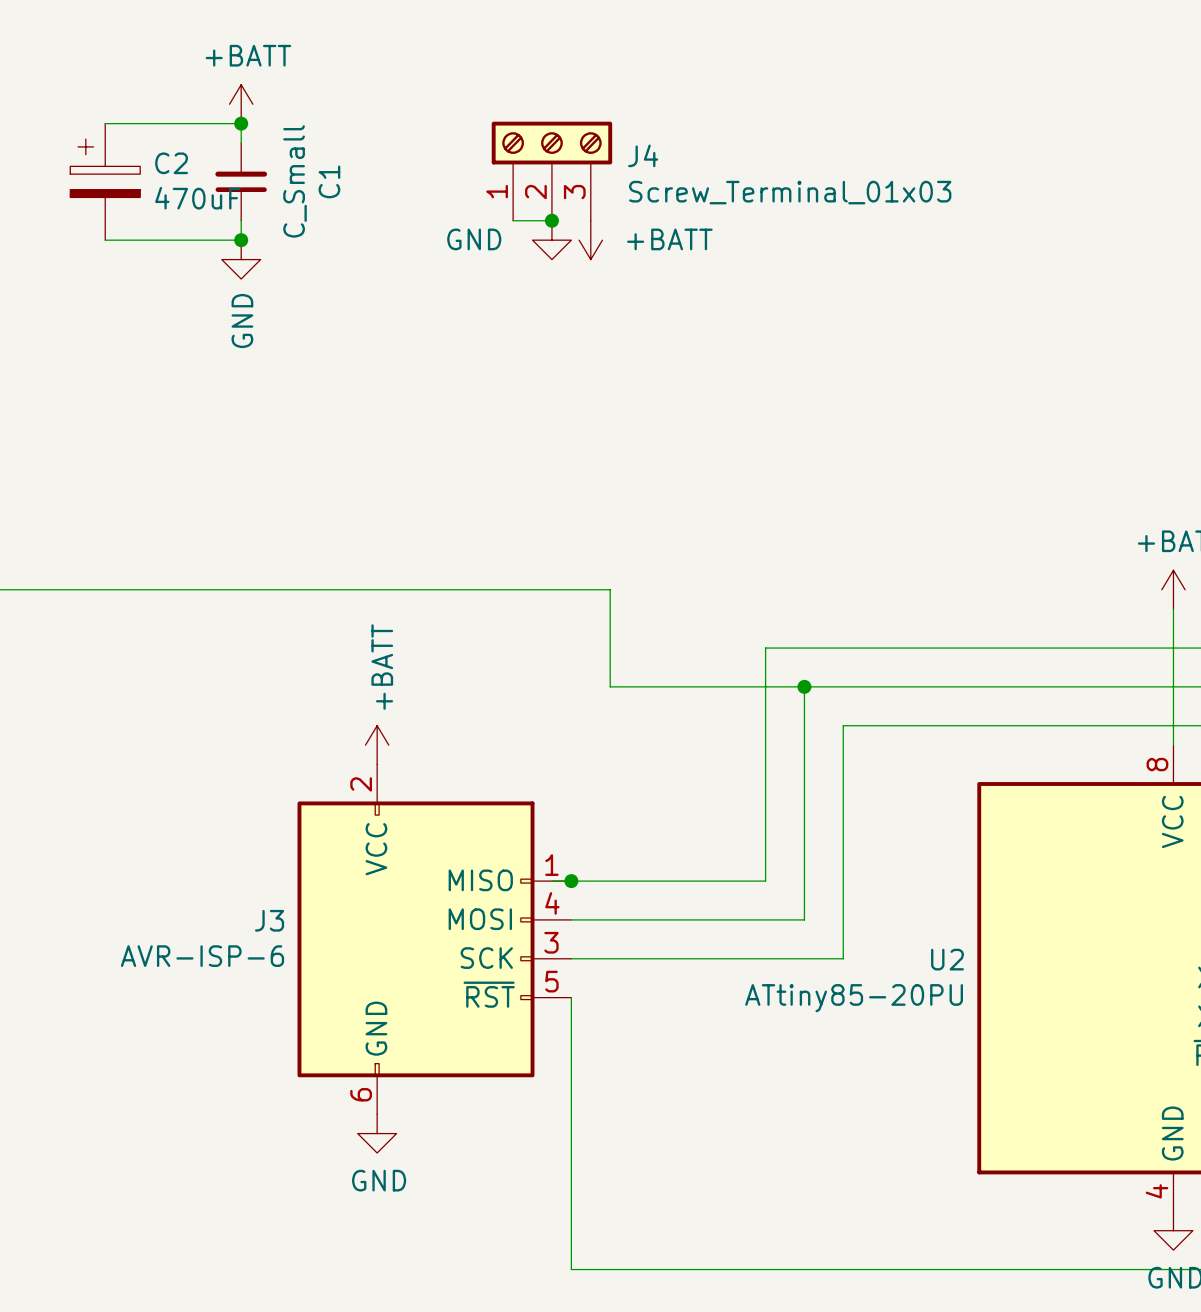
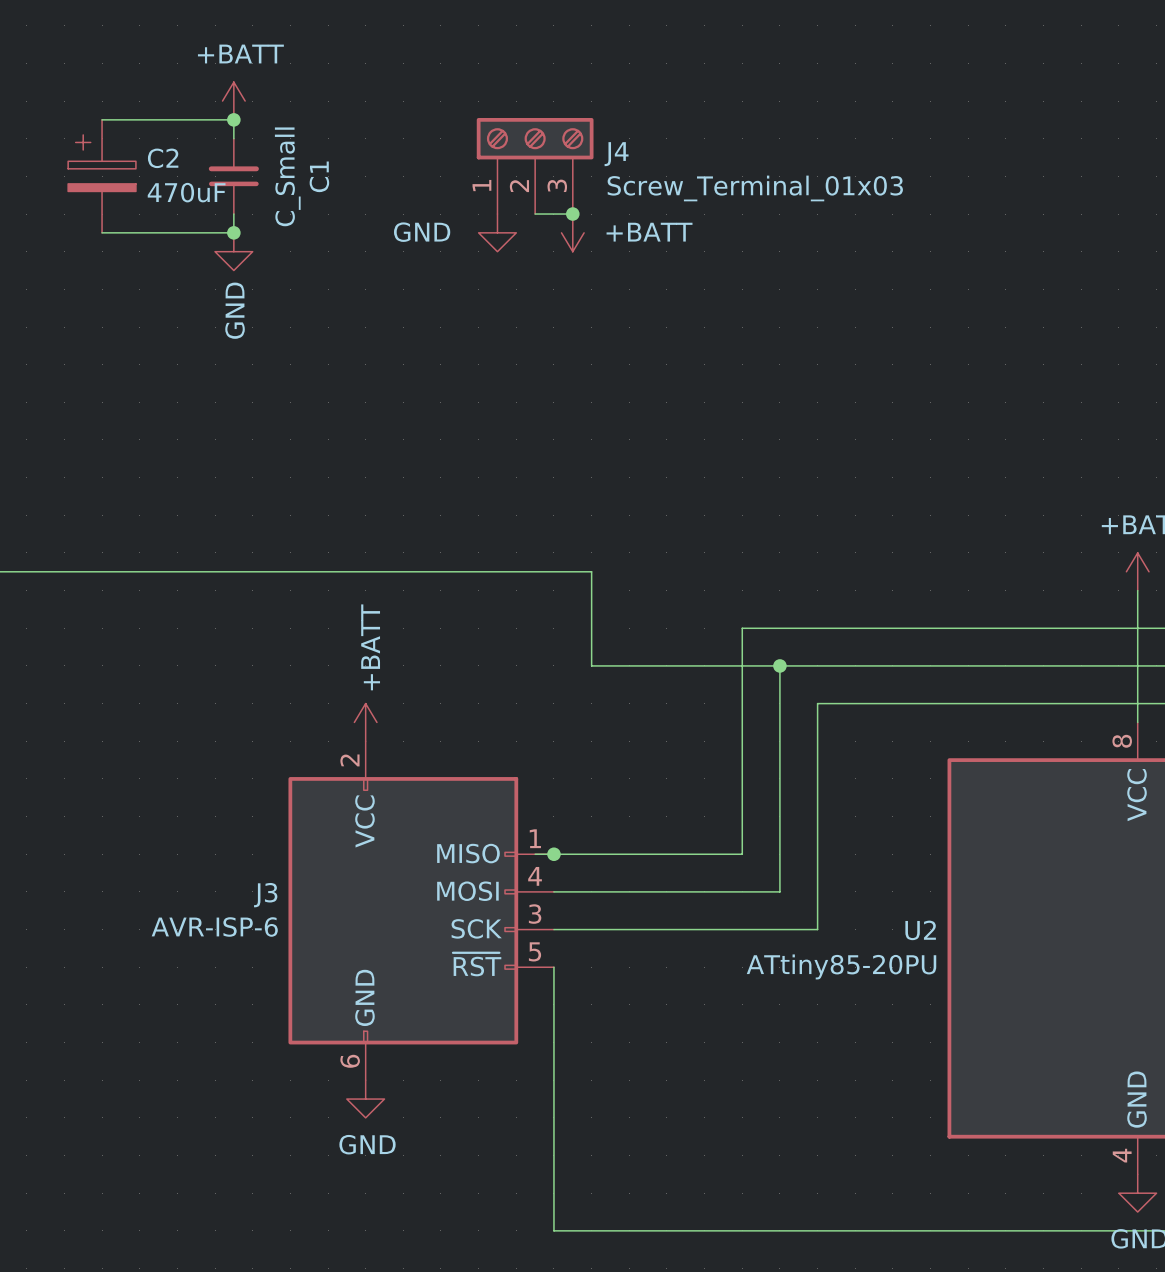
wire: (513, 220) (551, 220) -> (572, 214) (535, 214)
junction position: (551, 220) -> (572, 214)
power symbol position: GND (551, 240) -> GND (497, 232)

